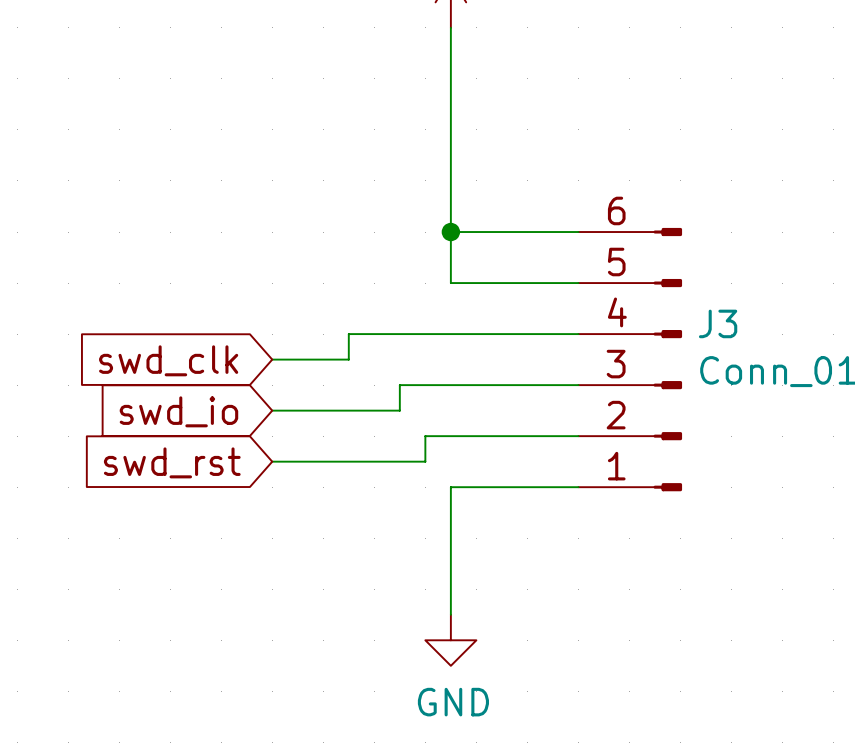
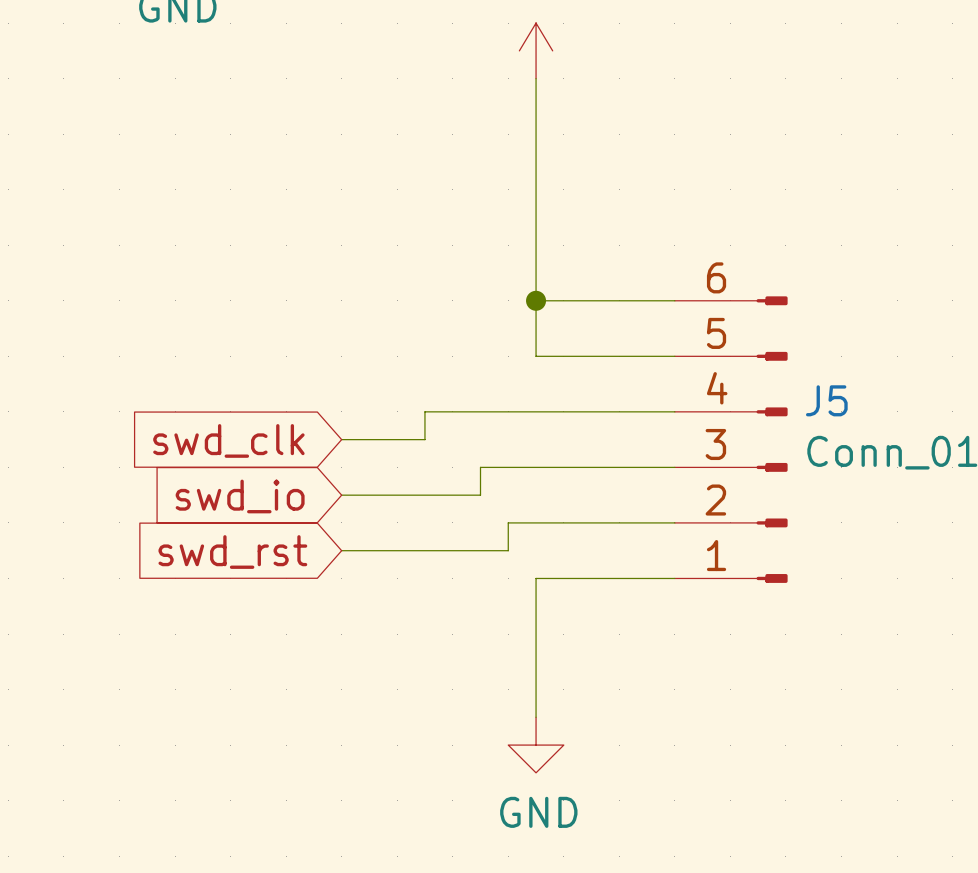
J3 name: J3 (718, 323) -> J5 (826, 400)

